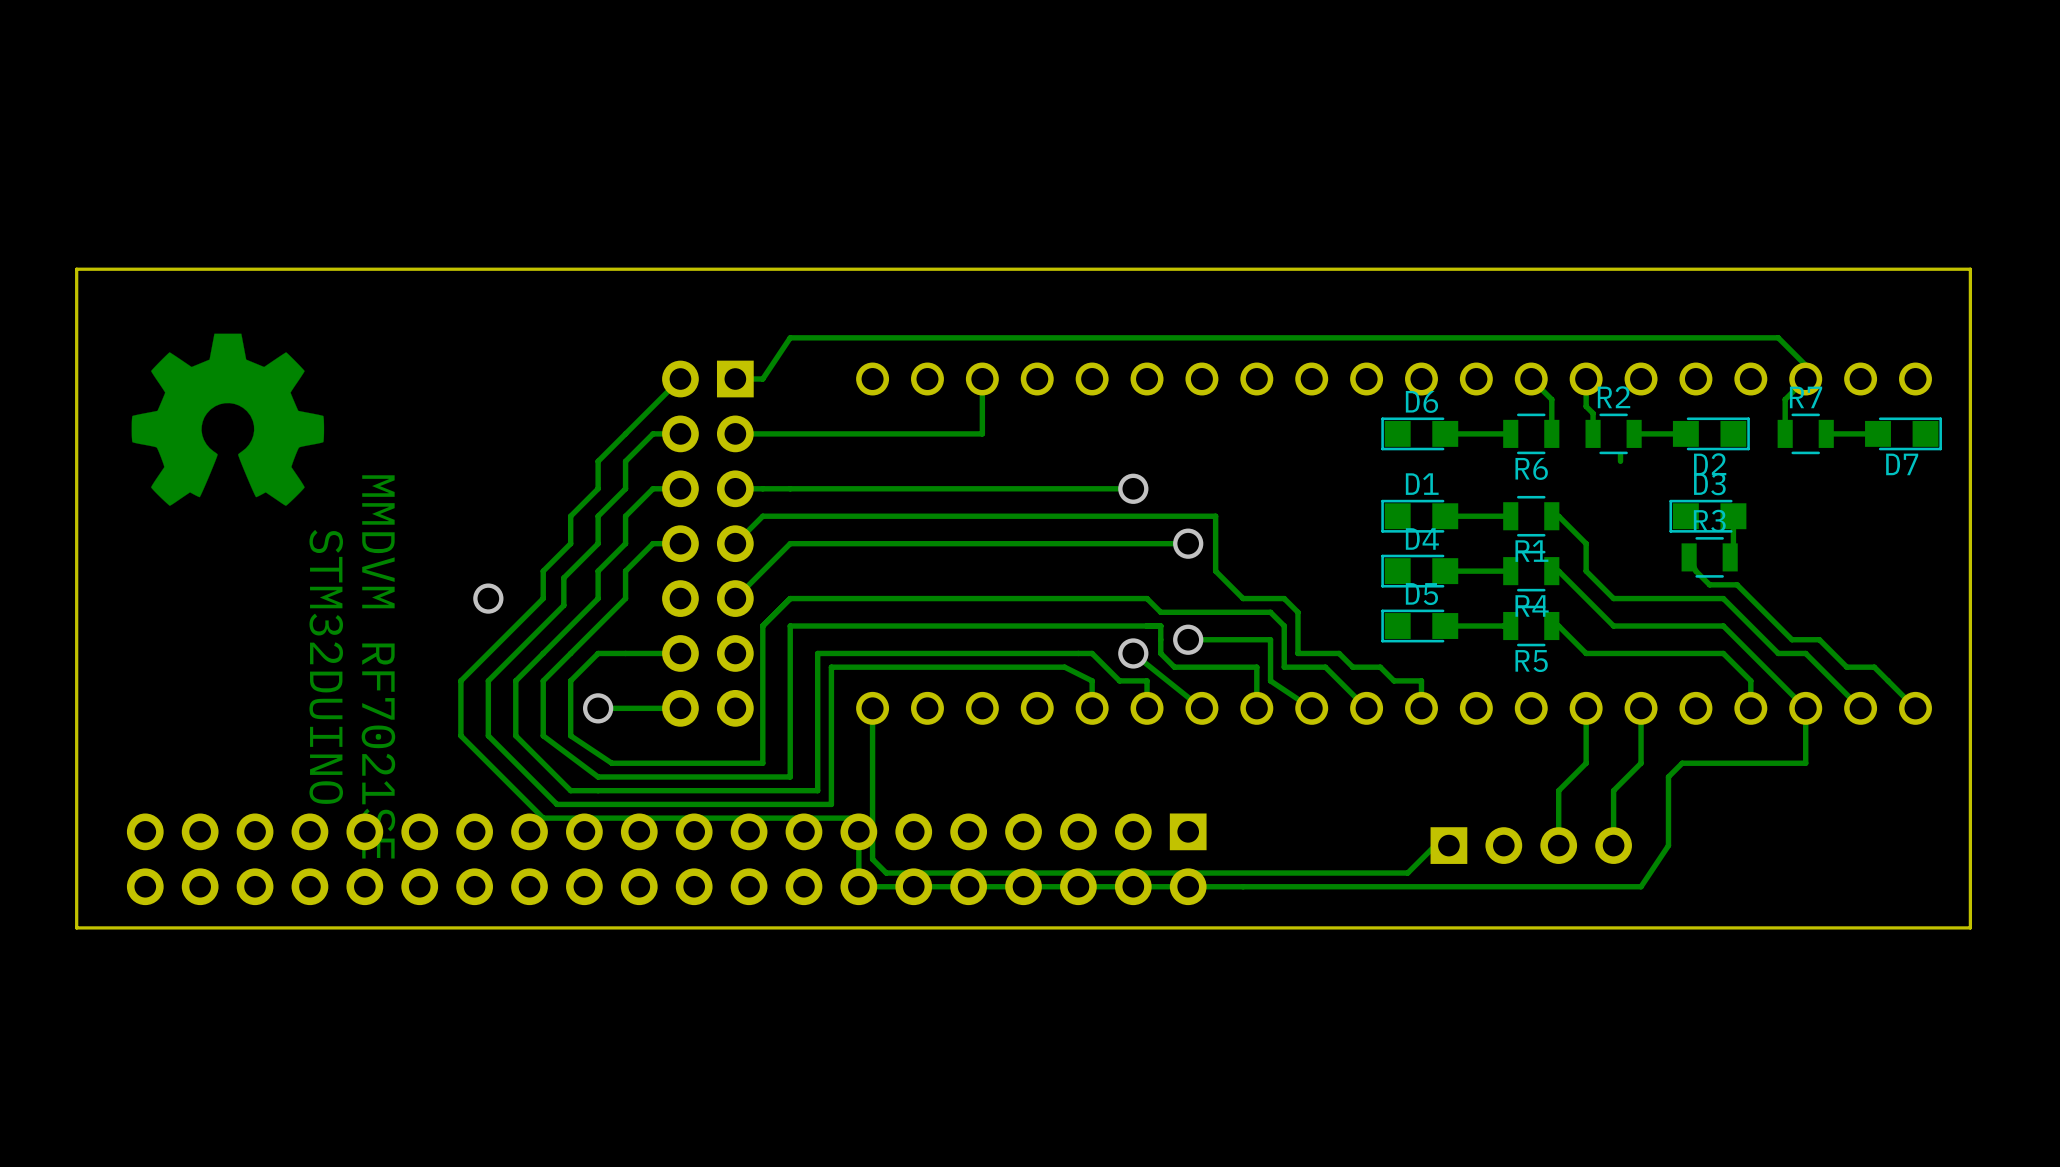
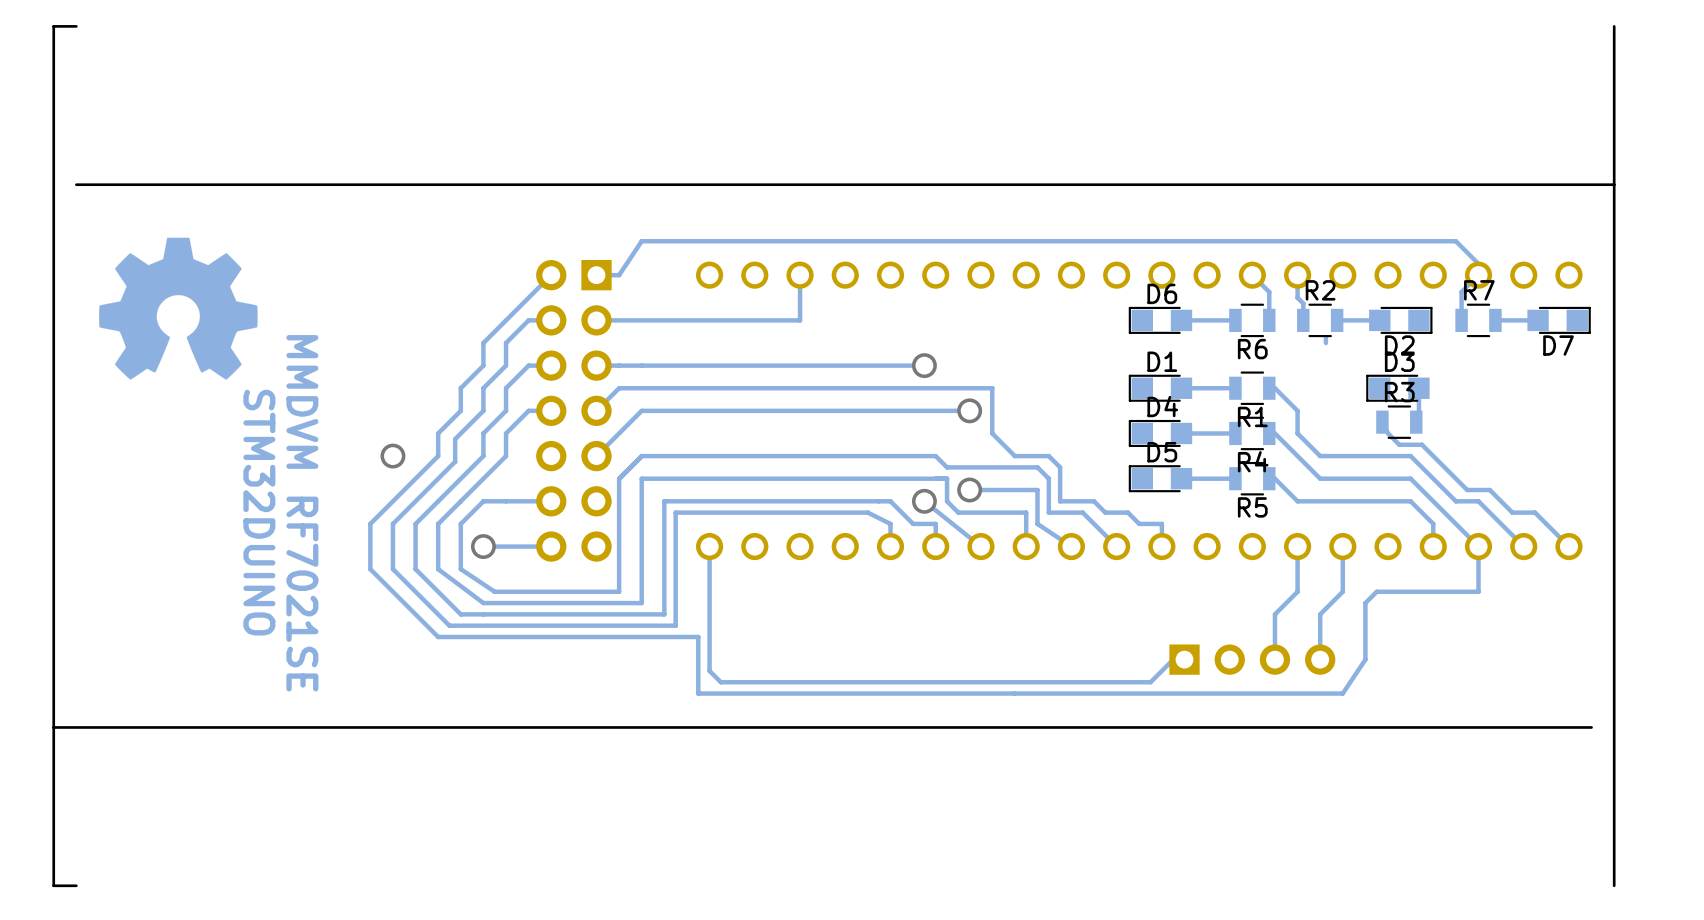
board edge: none -> (1614, 26) (1614, 184)
board edge: (104, 269) (76, 269) -> (76, 26) (53, 26) (53, 184)
part: (666, 859) -> none
board edge: none -> (53, 727) (53, 885) (76, 885)
board edge: (1970, 927) (1942, 927) -> (1614, 727) (1614, 885)

